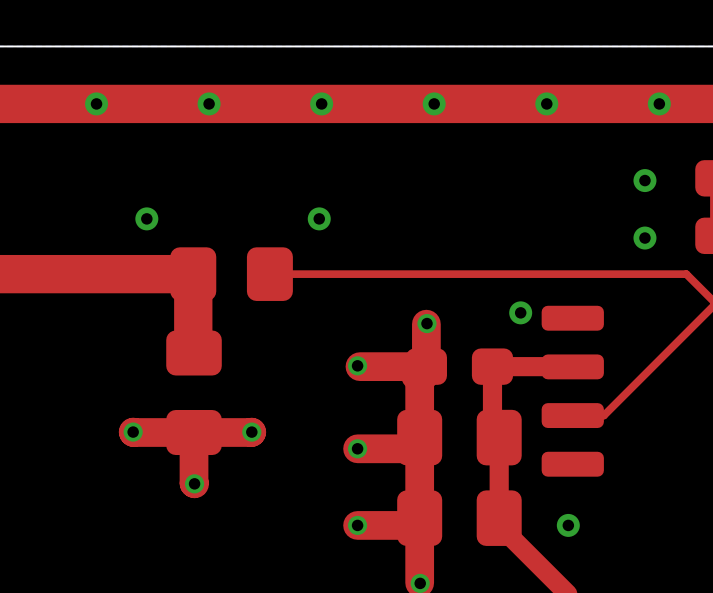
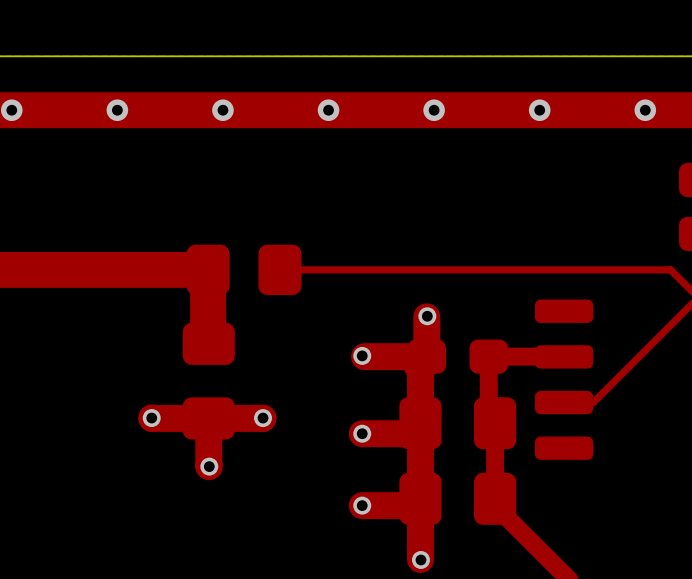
via: (644, 180) -> none
via: (146, 218) -> none
via: (319, 218) -> none
via: (644, 238) -> none
via: (520, 312) -> none
via: (568, 525) -> none

